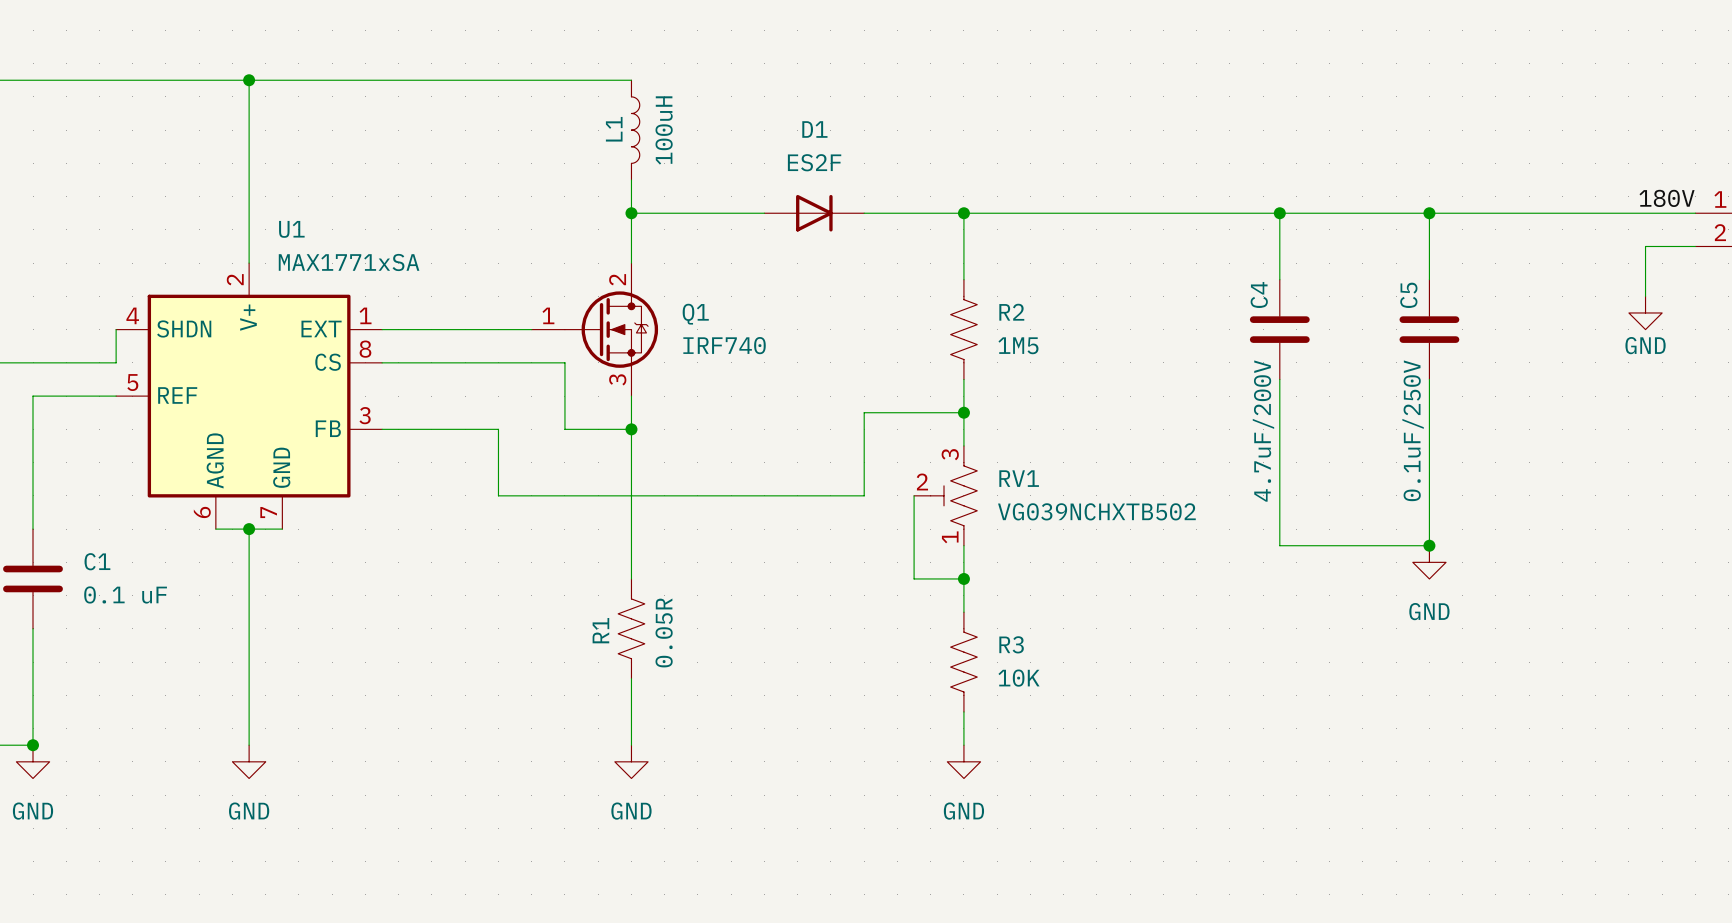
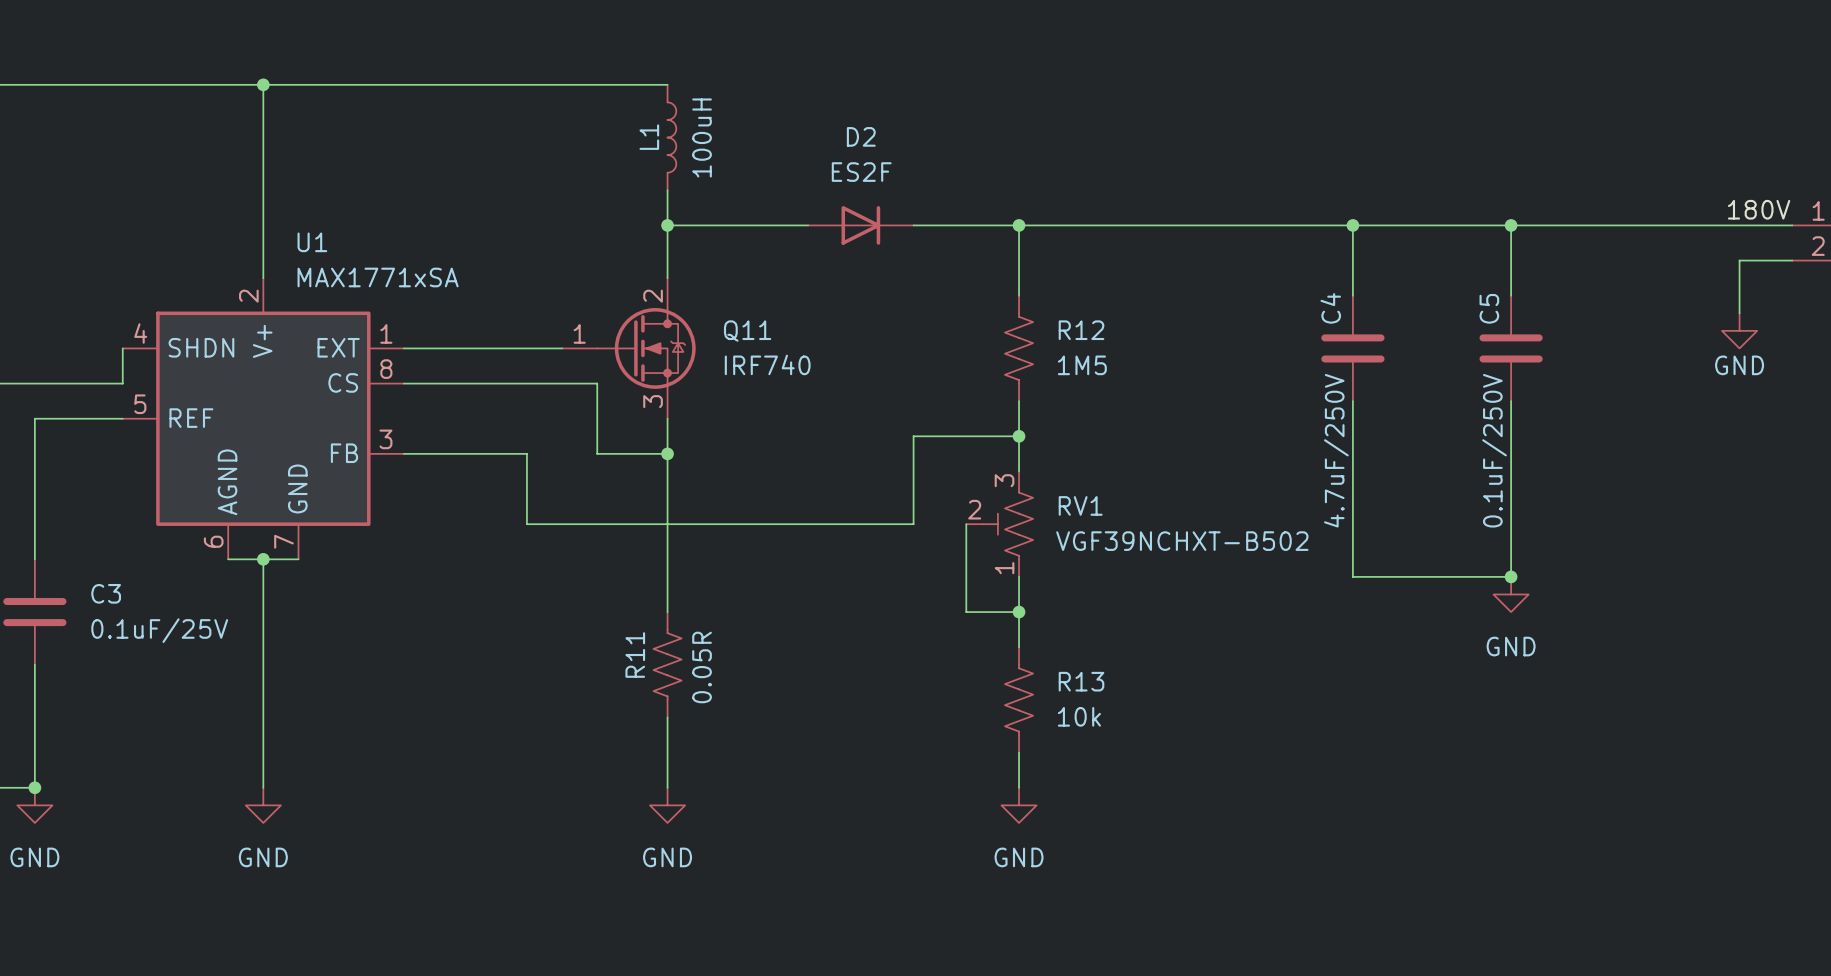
D1 name: D1 (814, 129) -> D2 (861, 136)
R2 name: R2 (1011, 312) -> R12 (1081, 330)
Q1 name: Q1 (695, 314) -> Q11 (747, 331)
C4 value: 4.7uF/200V (1263, 431) -> 4.7uF/250V (1336, 450)
RV1 value: VG039NCHXTB502 (1096, 511) -> VGF39NCHXT-B502 (1182, 541)
C1 name: C1 (97, 561) -> C3 (106, 593)
C1 value: 0.1 uF (125, 594) -> 0.1uF/25V (159, 630)
R1 name: R1 (600, 630) -> R11 (635, 655)
R3 name: R3 (1011, 644) -> R13 (1081, 681)
R3 value: 10K (1019, 678) -> 10k (1079, 716)

